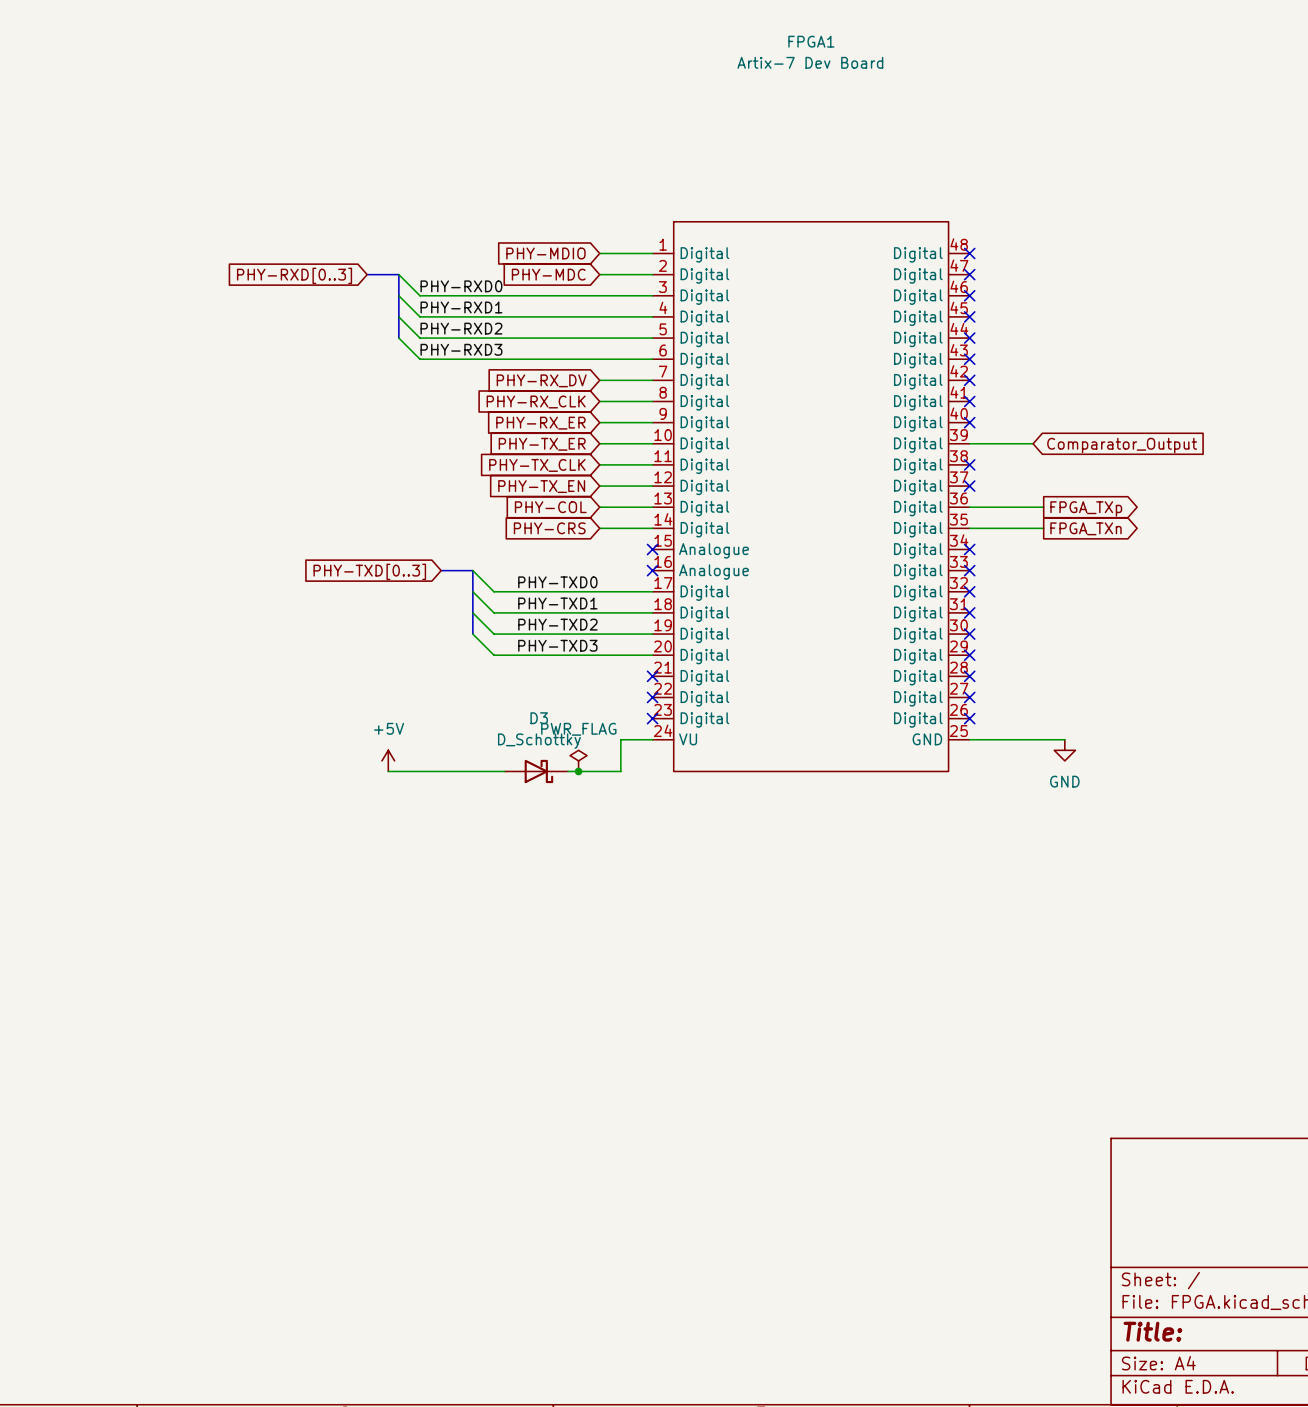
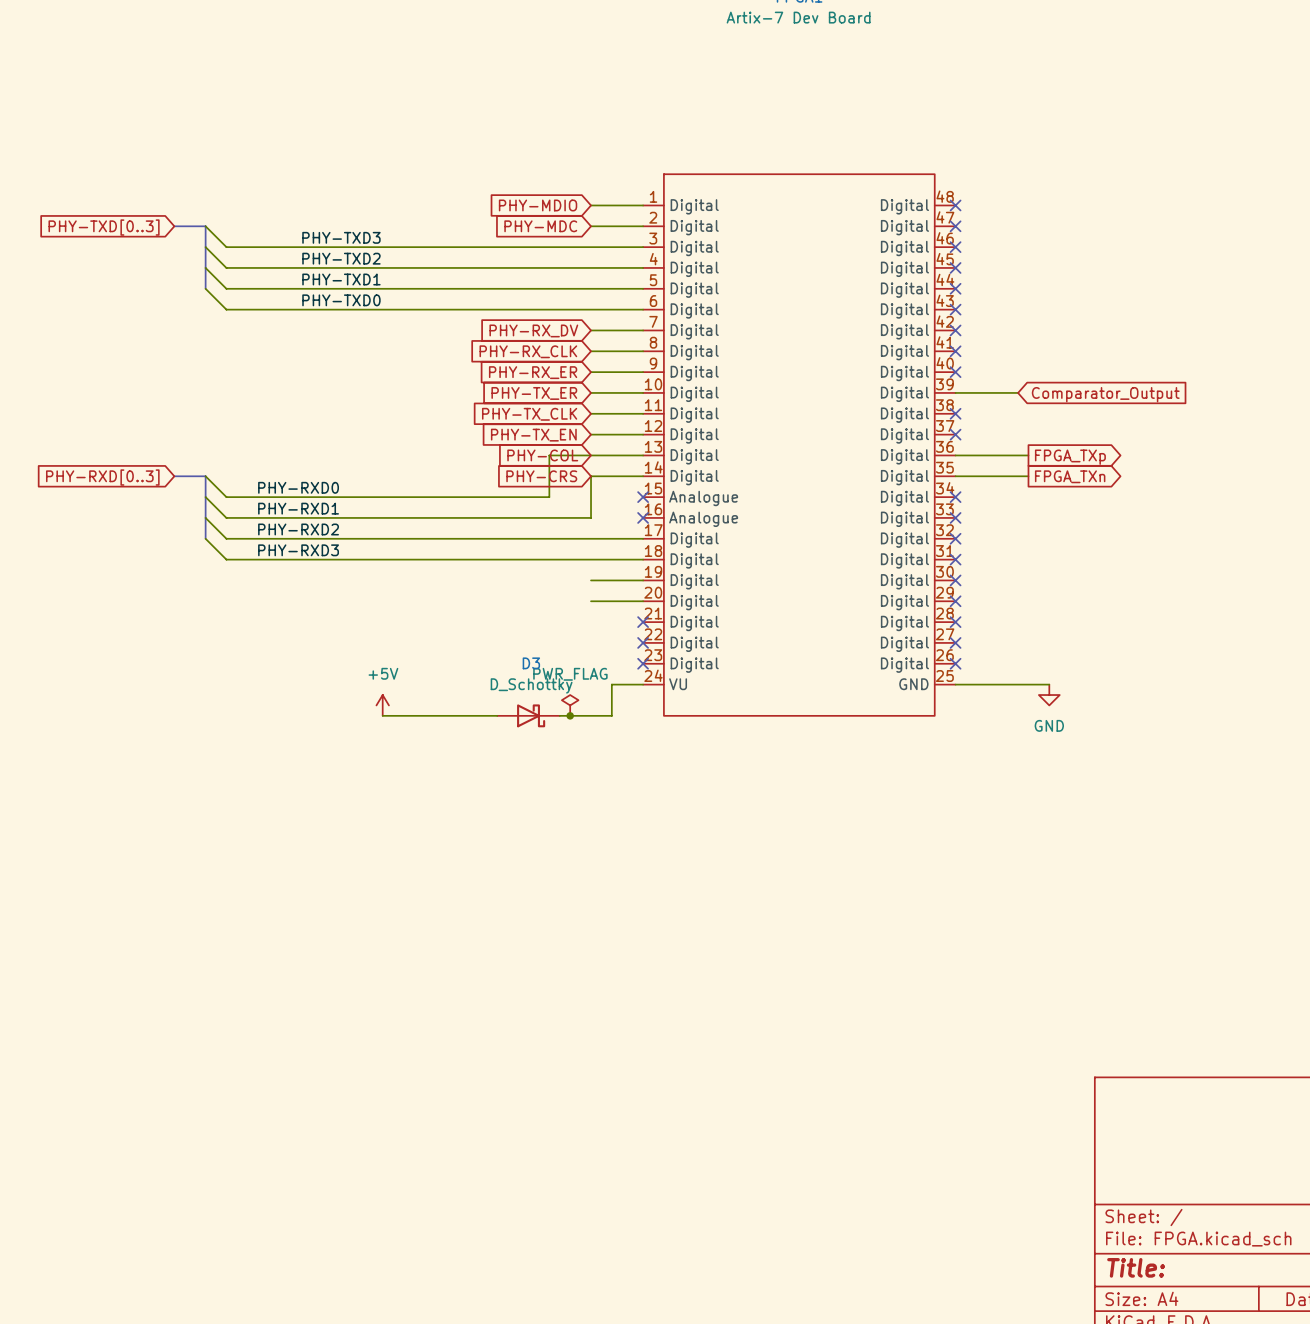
bus: (367, 274) (398, 274) (398, 338) -> (174, 226) (205, 226) (205, 288)
wire: (398, 274) (420, 295) -> (205, 226) (226, 247) (413, 247)
global label: none -> PHY-TXD[0..3] (104, 227)
global label: PHY-RXD[0..3] (294, 275) -> none
label: none -> PHY-TXD3 (341, 237)
label: PHY-RXD0 (461, 286) -> none
wire: (398, 295) (420, 316) -> (205, 247) (226, 267) (413, 267)
label: none -> PHY-TXD2 (341, 258)
label: PHY-RXD1 (461, 307) -> none
wire: (398, 316) (420, 338) -> (205, 267) (226, 288) (413, 288)
label: none -> PHY-TXD1 (341, 279)
label: PHY-RXD2 (461, 328) -> none
wire: (398, 338) (420, 359) -> (205, 288) (226, 309) (413, 309)
label: none -> PHY-TXD0 (341, 300)
label: PHY-RXD3 (461, 349) -> none
wire: none -> (591, 455) (549, 455) (549, 497) (226, 497) (205, 476)
bus: none -> (174, 476) (205, 476) (205, 538)
wire: none -> (591, 476) (591, 517) (226, 517) (205, 497)
global label: none -> PHY-RXD[0..3] (102, 477)
label: none -> PHY-RXD0 (298, 487)
label: none -> PHY-RXD1 (298, 508)
bus: (441, 570) (472, 570) (472, 634) -> none
wire: (472, 570) (494, 591) -> (205, 517) (226, 538) (486, 538)
global label: PHY-TXD[0..3] (369, 571) -> none
label: none -> PHY-RXD2 (298, 529)
label: PHY-TXD0 (557, 582) -> none
wire: (472, 591) (494, 612) -> (205, 538) (226, 559) (486, 559)
label: none -> PHY-RXD3 (298, 550)
label: PHY-TXD1 (557, 603) -> none
wire: (472, 612) (494, 634) (599, 634) -> none
label: PHY-TXD2 (557, 624) -> none
wire: (472, 634) (494, 655) (599, 655) -> none
label: PHY-TXD3 (557, 645) -> none

